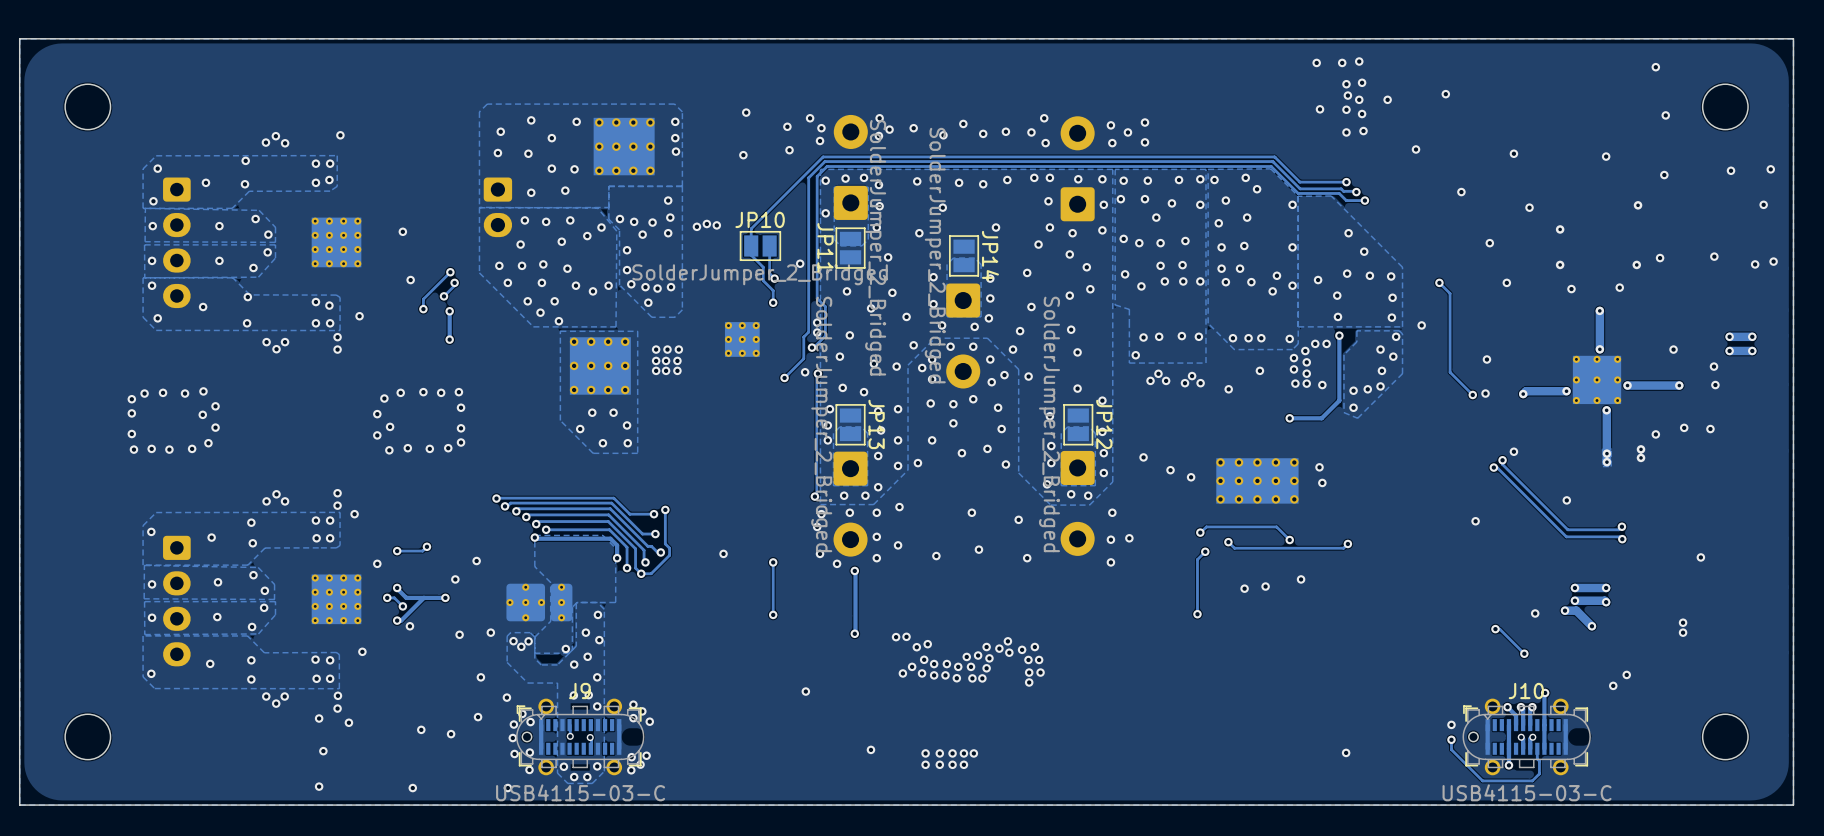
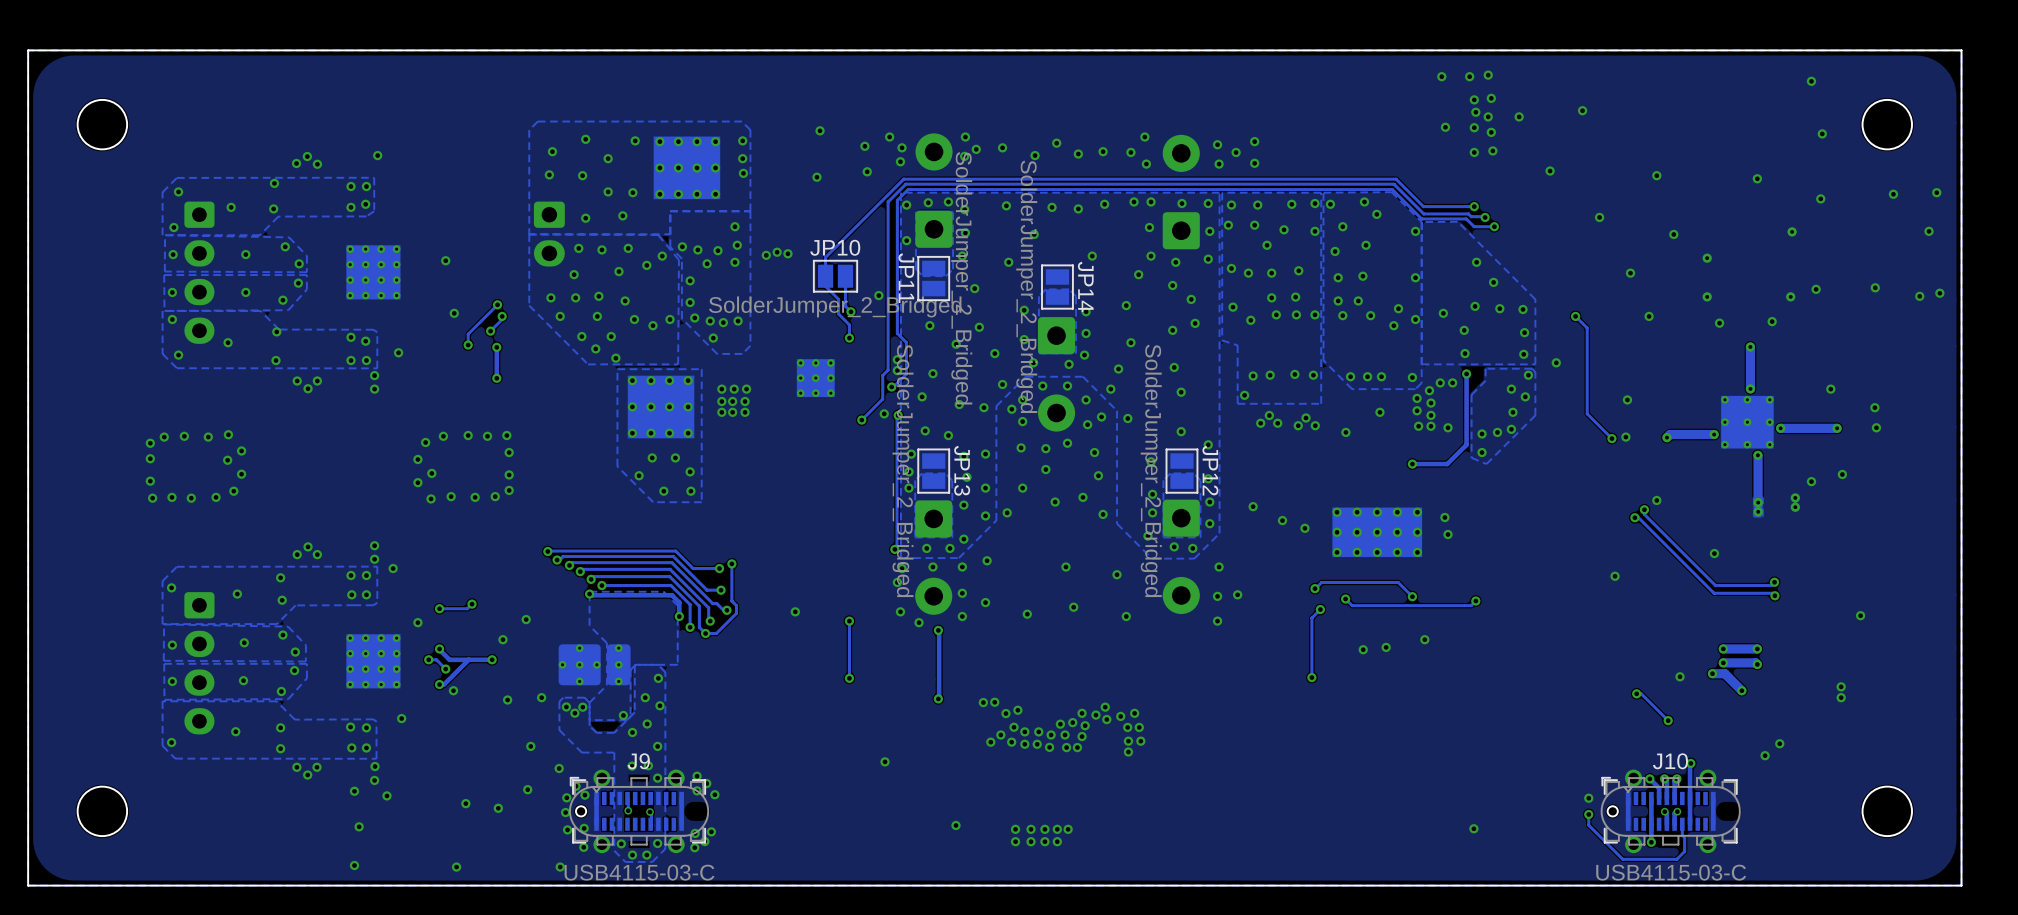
via: (1729, 336) -> none
track: (1752, 336) (1729, 336) -> none
via: (1752, 336) -> none
via: (1729, 350) -> none
track: (1752, 350) (1729, 350) -> none
via: (1752, 350) -> none
via: (1710, 429) -> none

